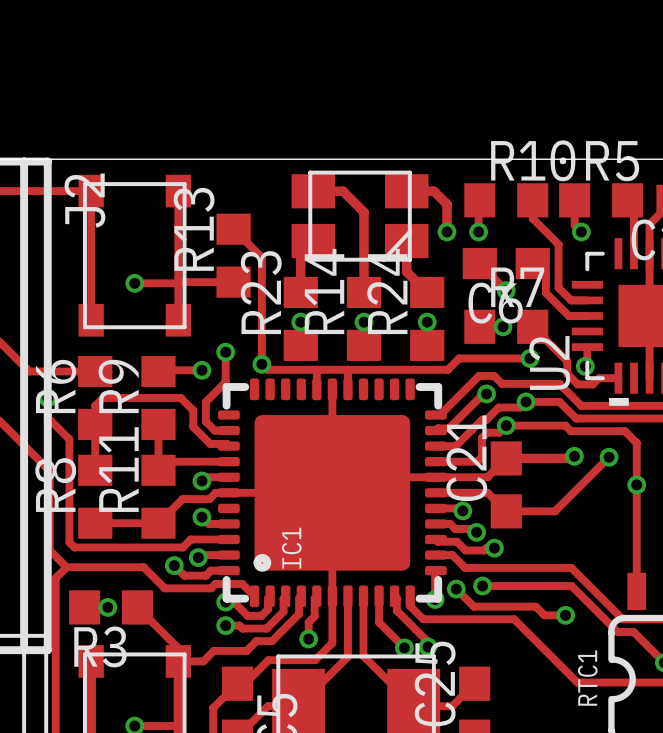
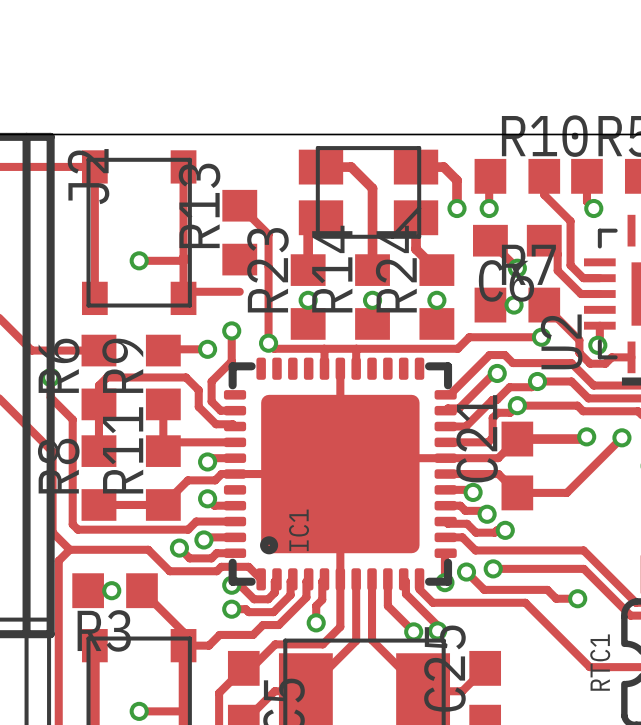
track: (181, 282) (233, 282) -> none
track: none -> (239, 291) (183, 293)

